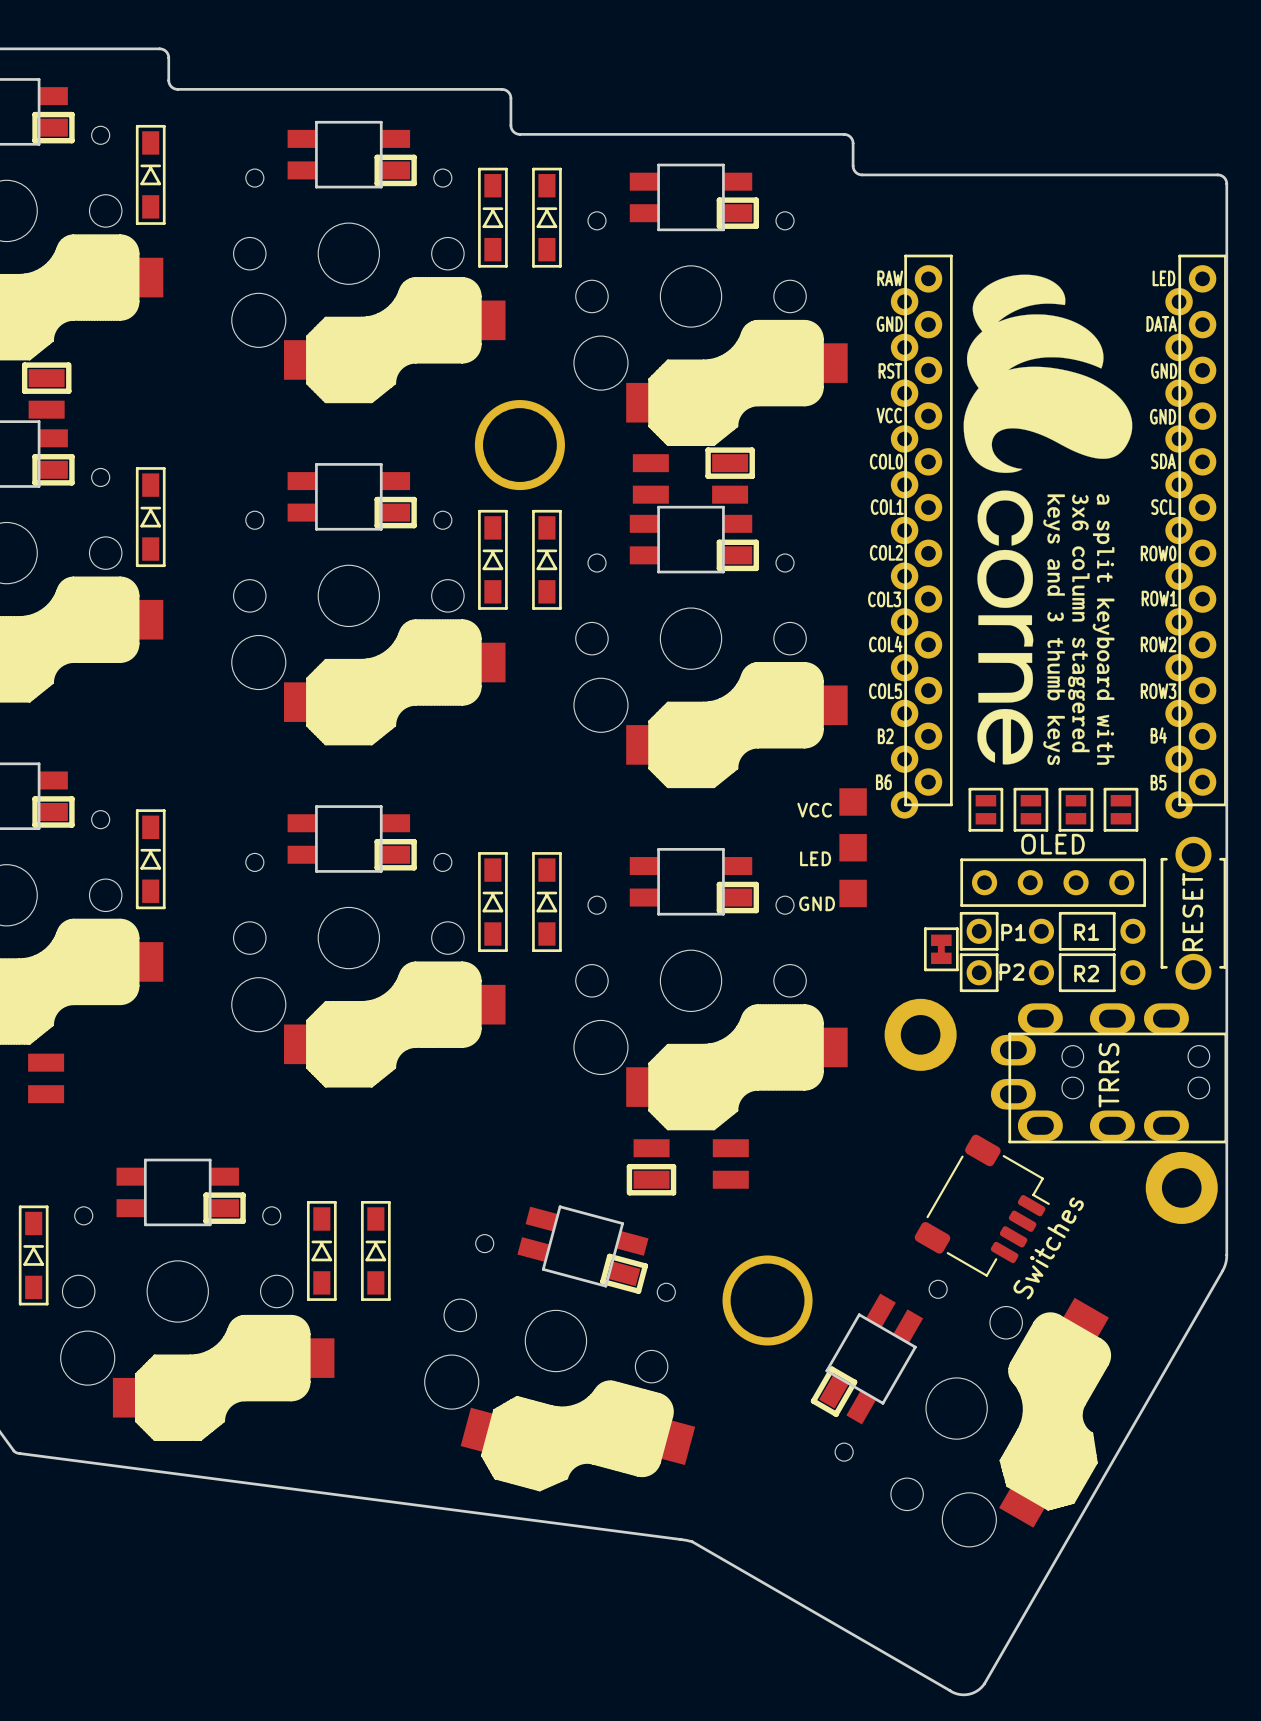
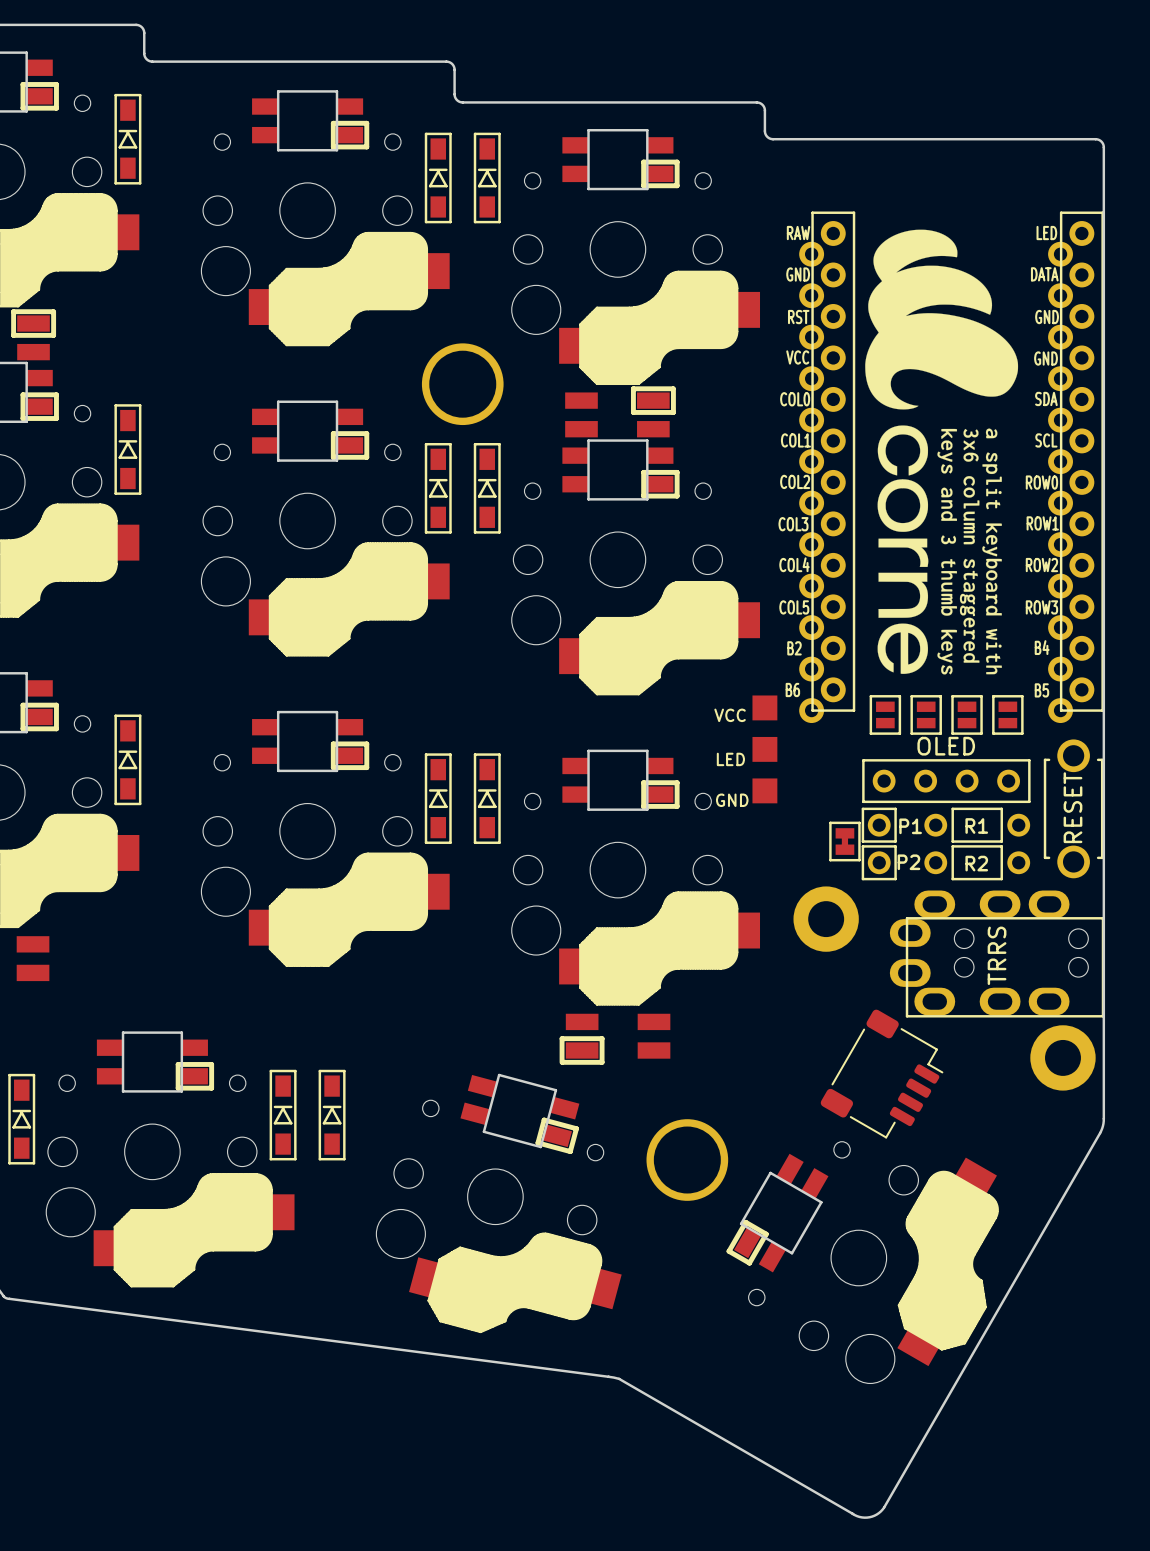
Switches name: Switches (1048, 1248) -> none

